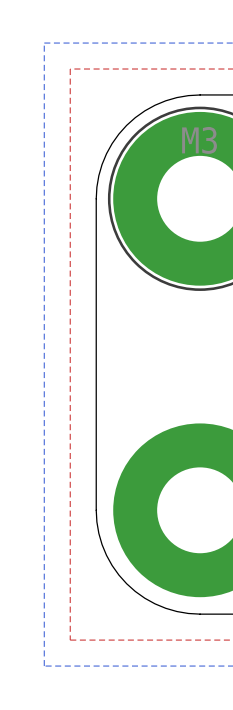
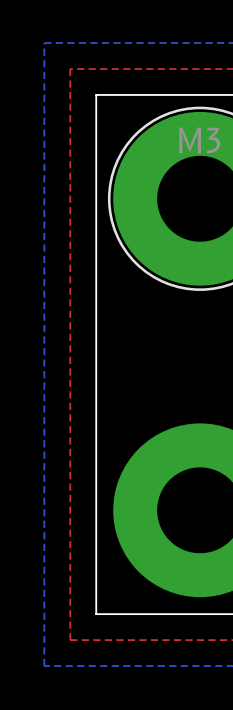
board edge: (200, 94) (176, 97) (155, 105) (126, 125) (106, 153) (98, 175) (96, 198) -> (200, 94) (96, 94) (96, 198)
board edge: (96, 510) (98, 533) (106, 555) (126, 583) (155, 603) (176, 611) (200, 614) -> (96, 510) (96, 614) (200, 614)

